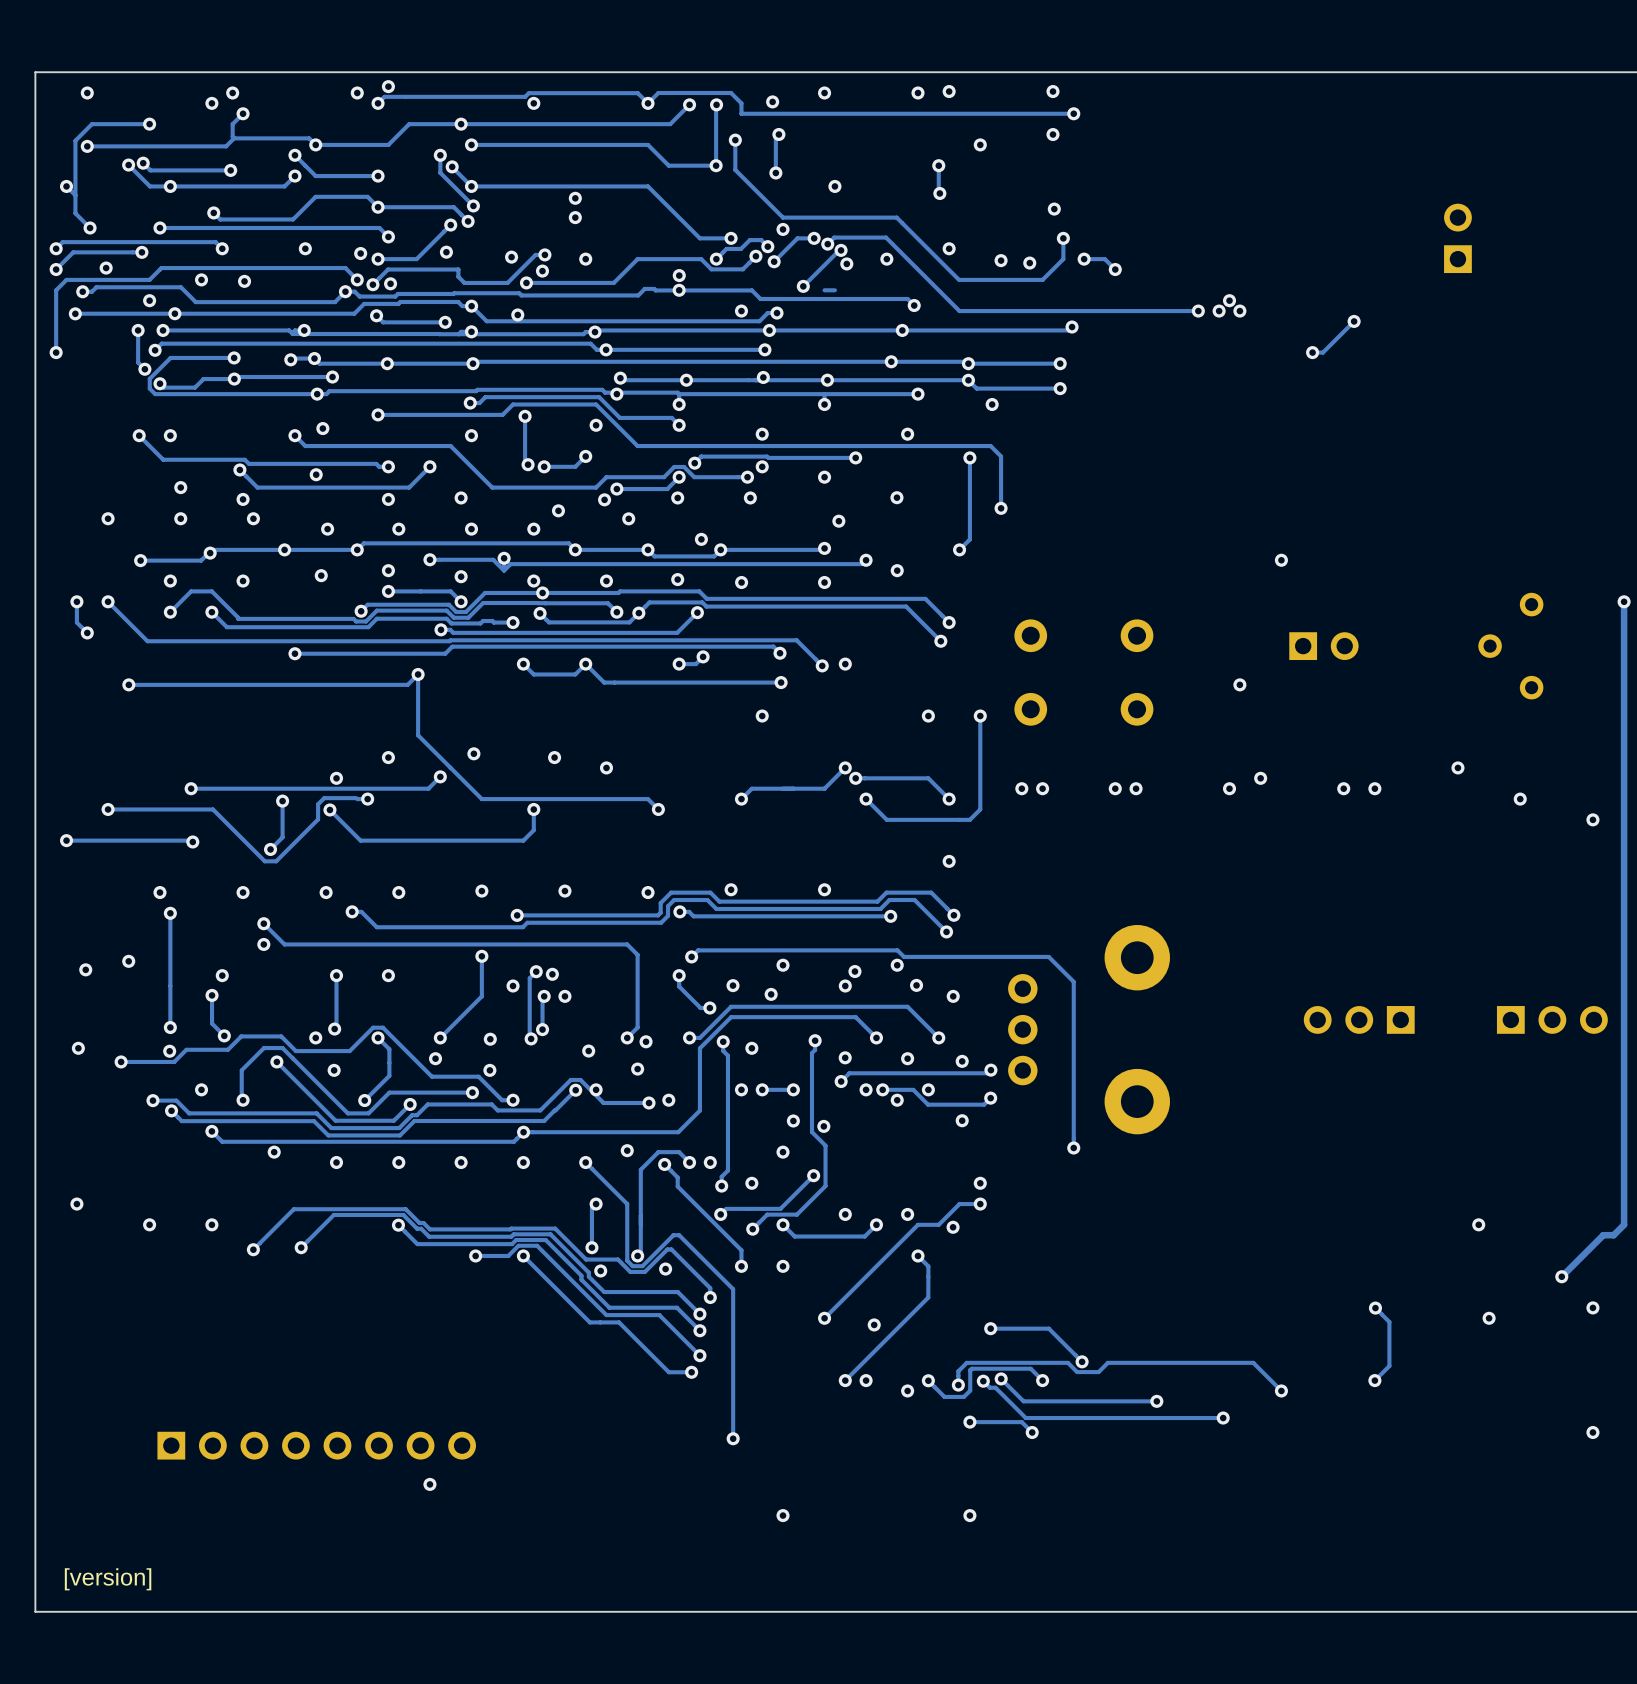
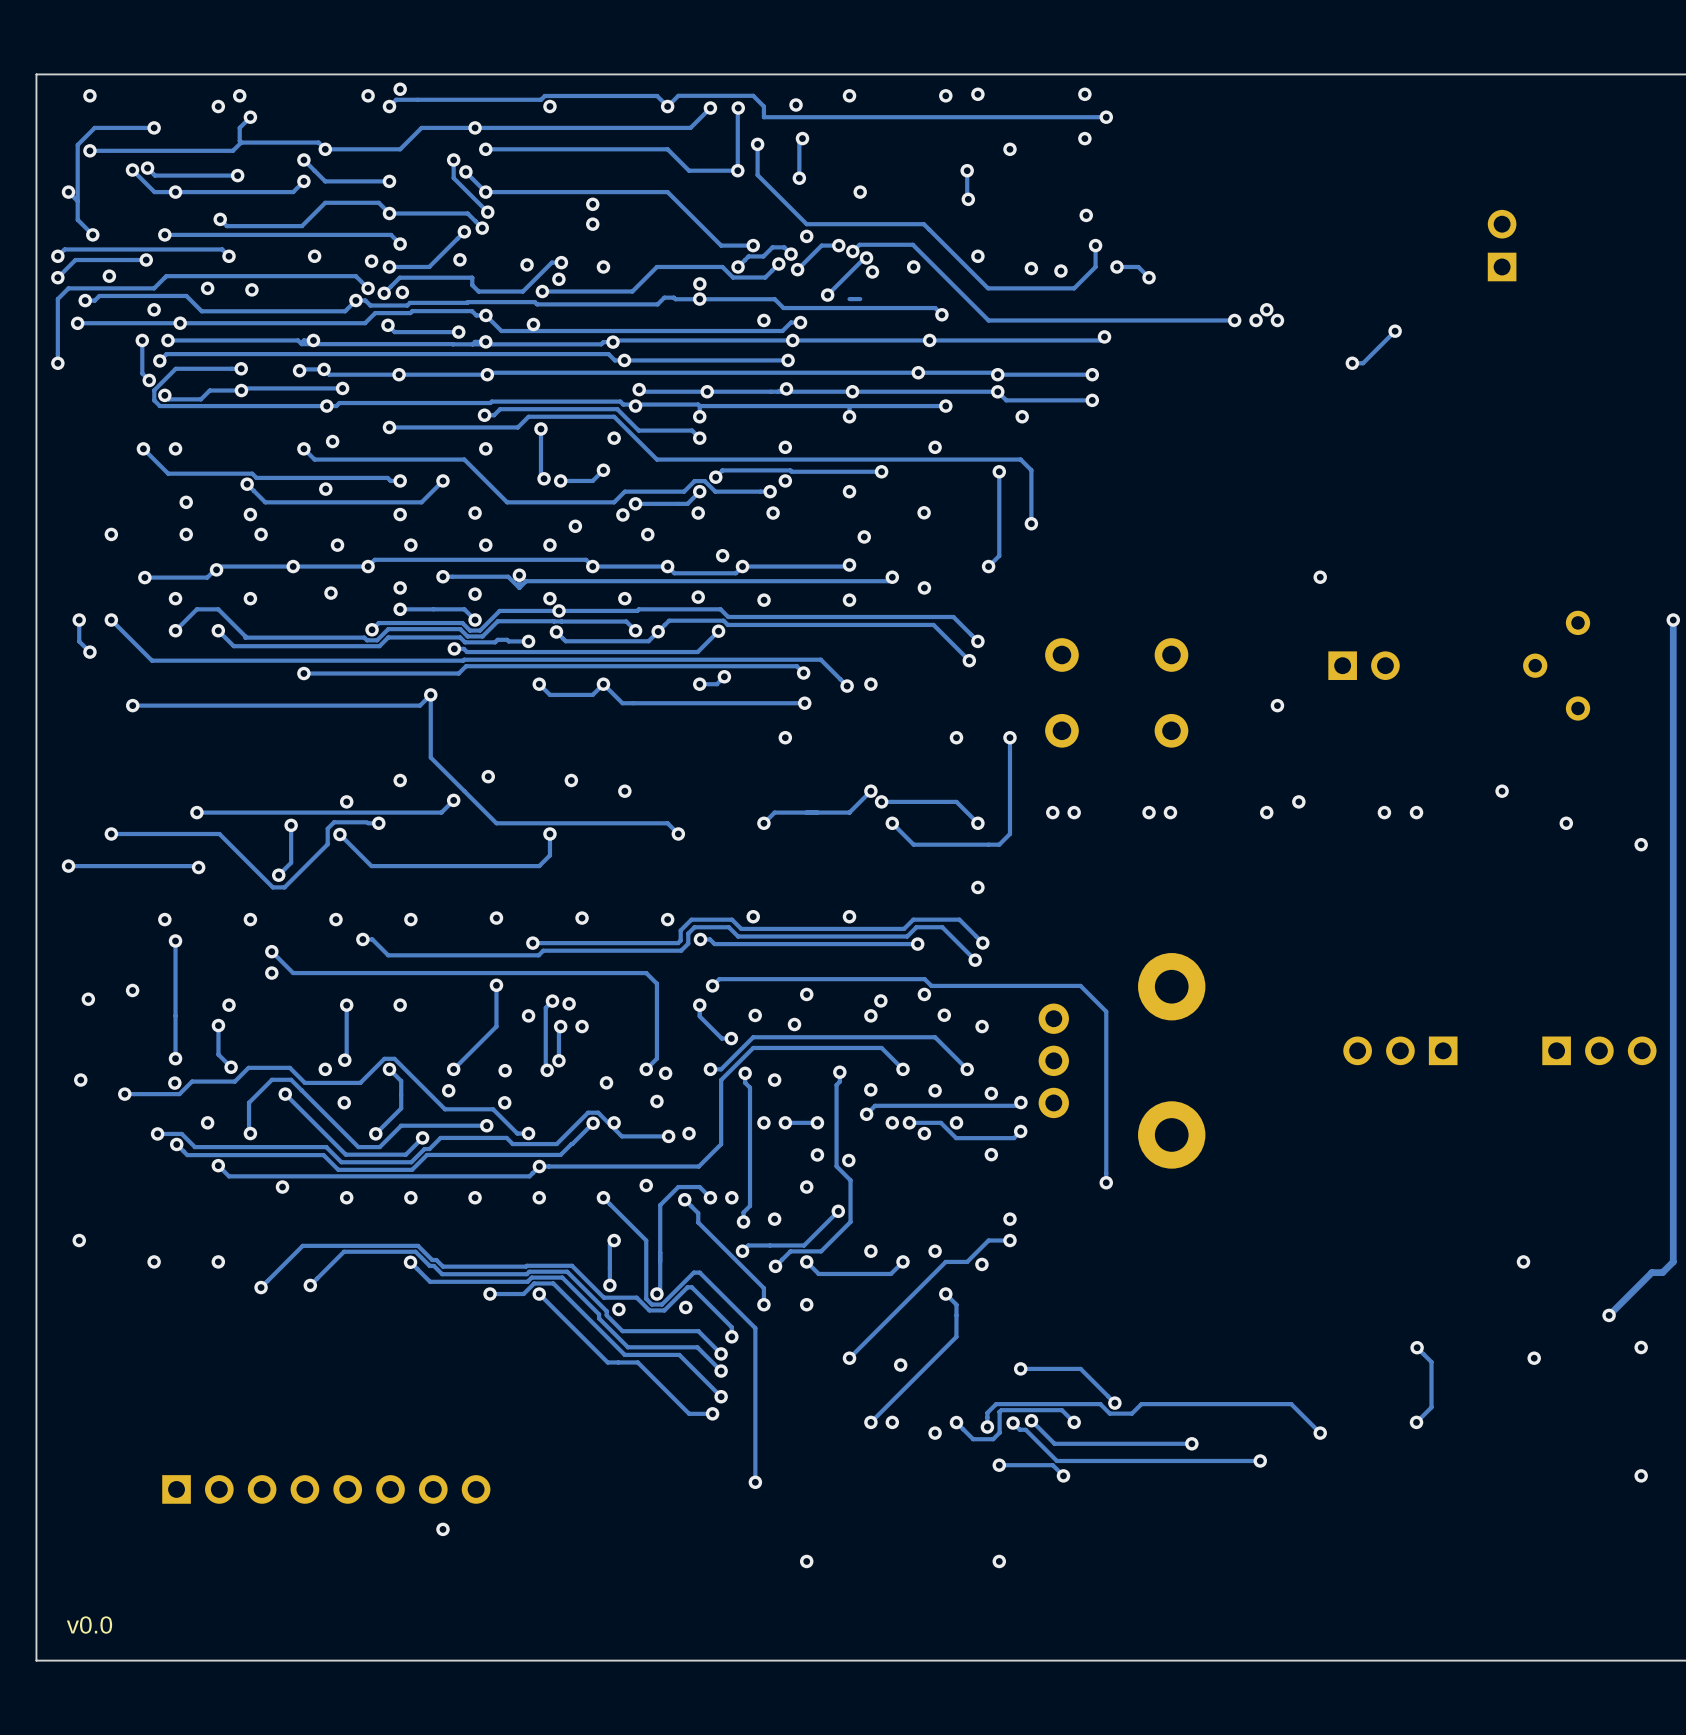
text: none -> v0.0 (89, 1625)
text: [version] (108, 1579) -> none

